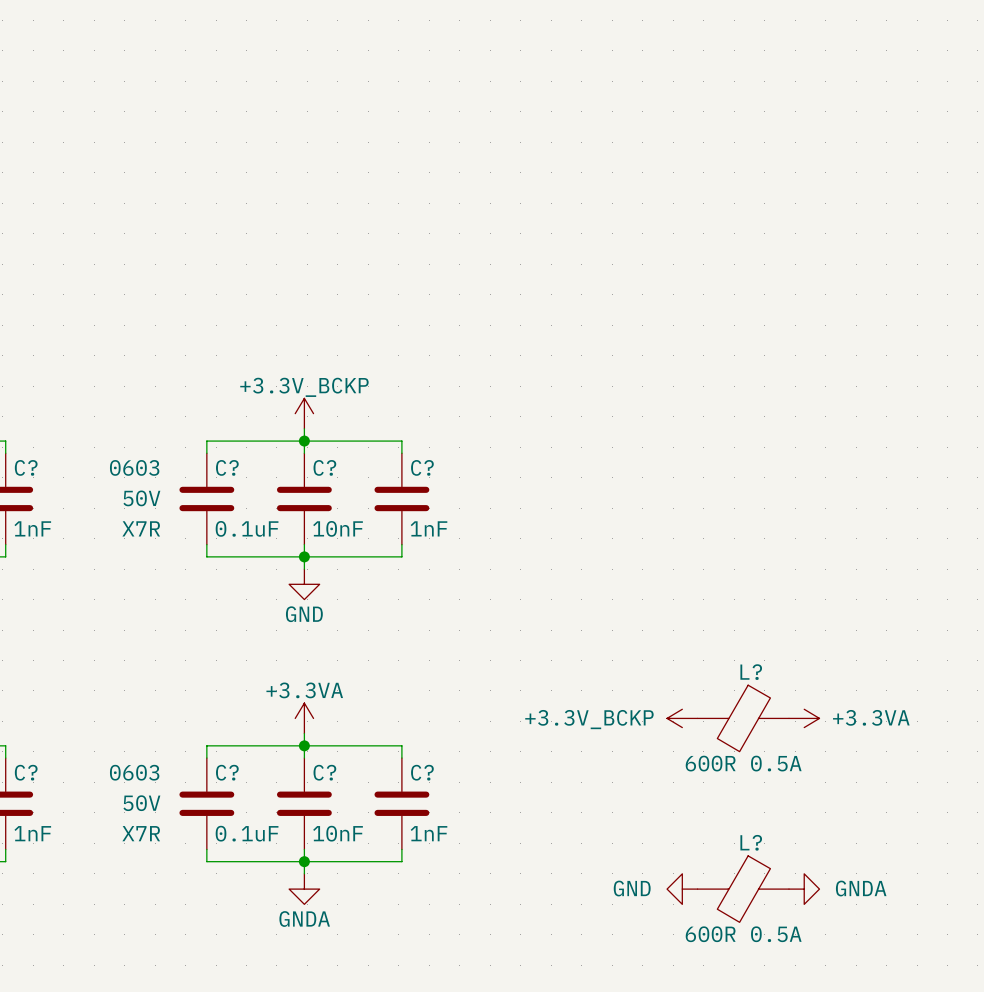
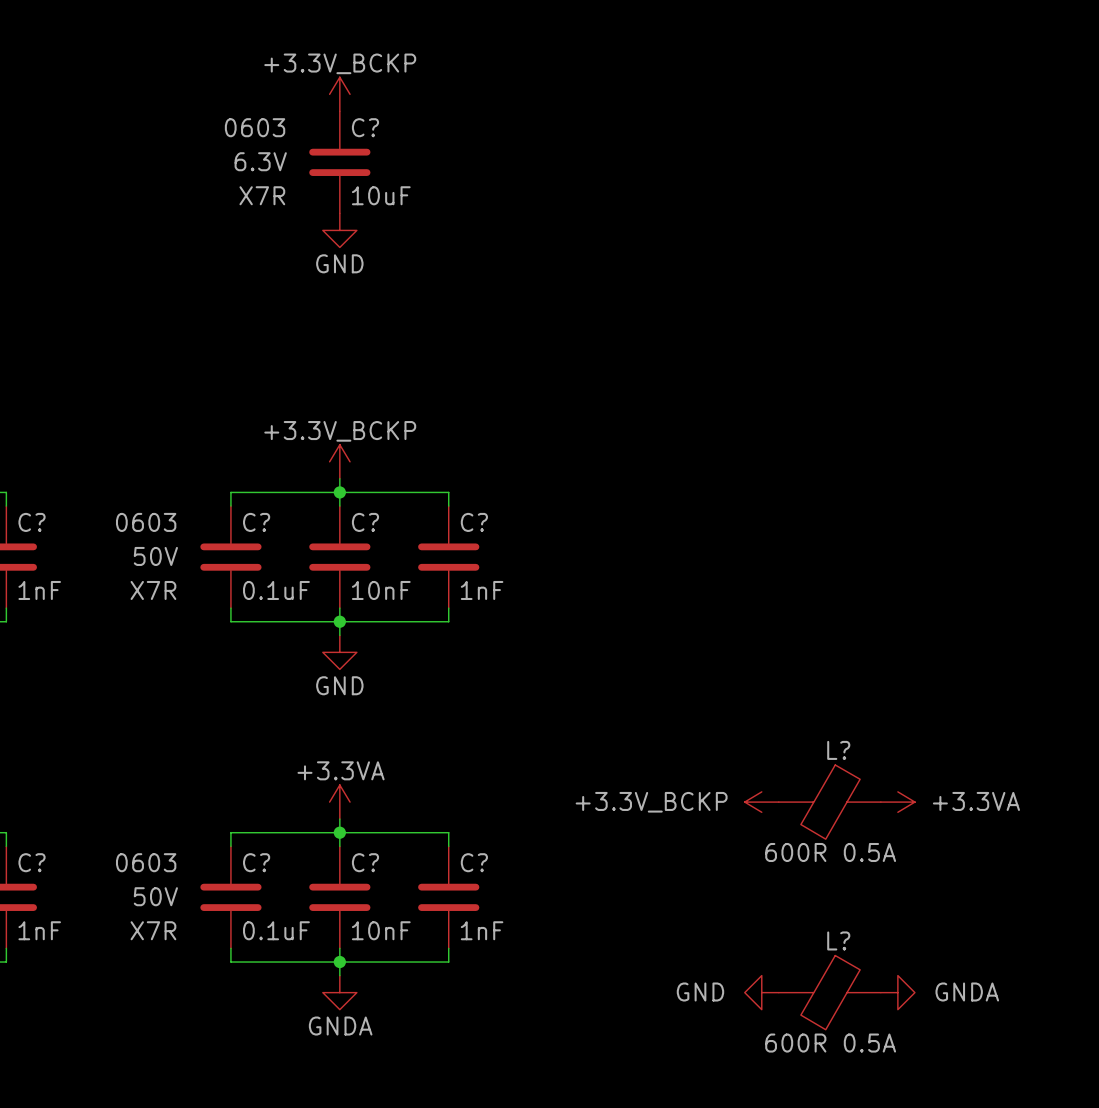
power symbol: none -> +3.3V_BCKP (339, 94)
C?: none -> 10uF (339, 162)
power symbol: none -> GND (339, 230)

